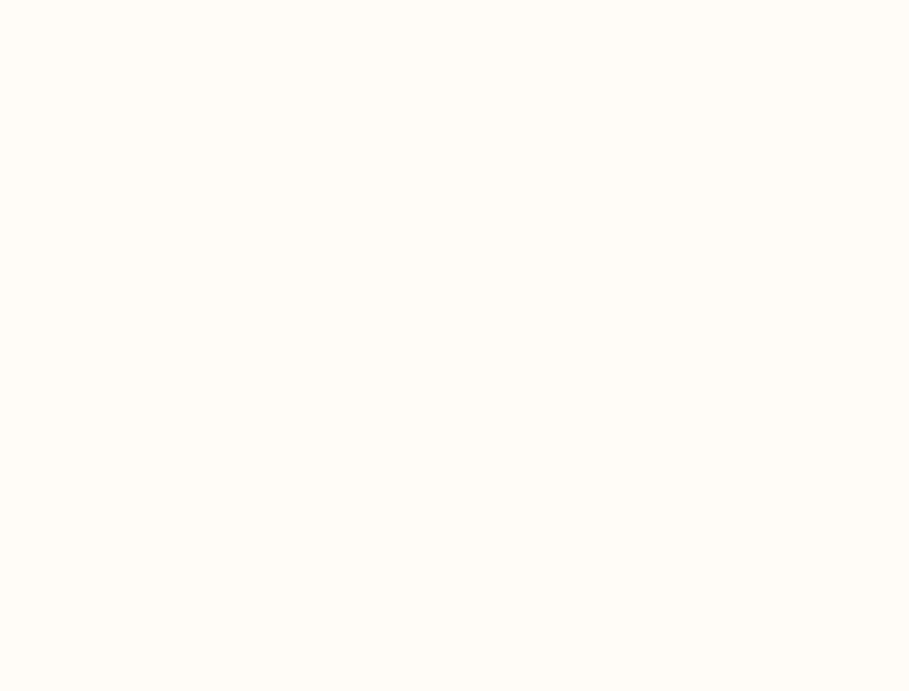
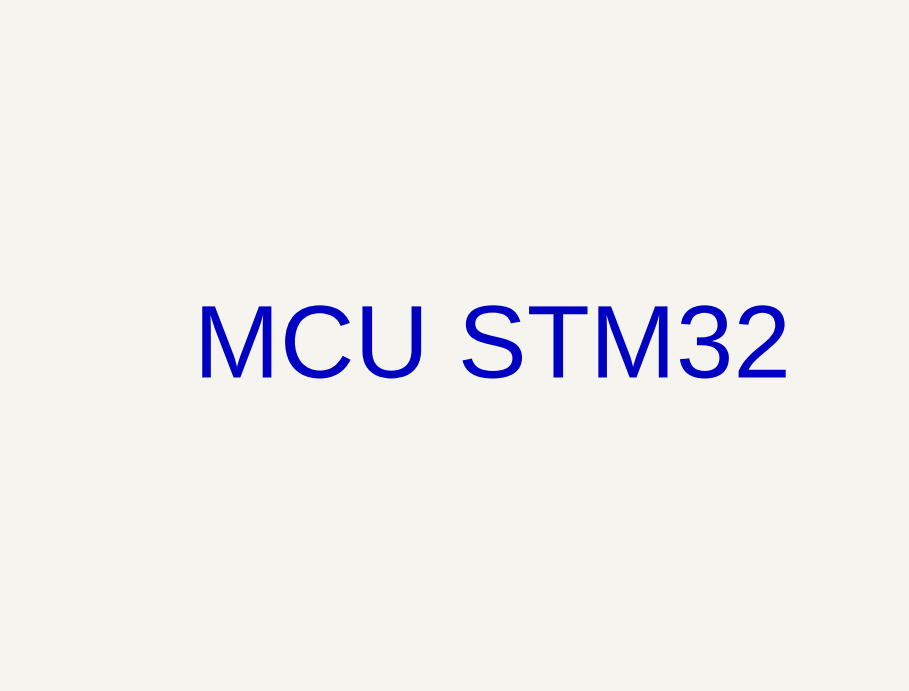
text: none -> MCU STM32 (493, 341)

